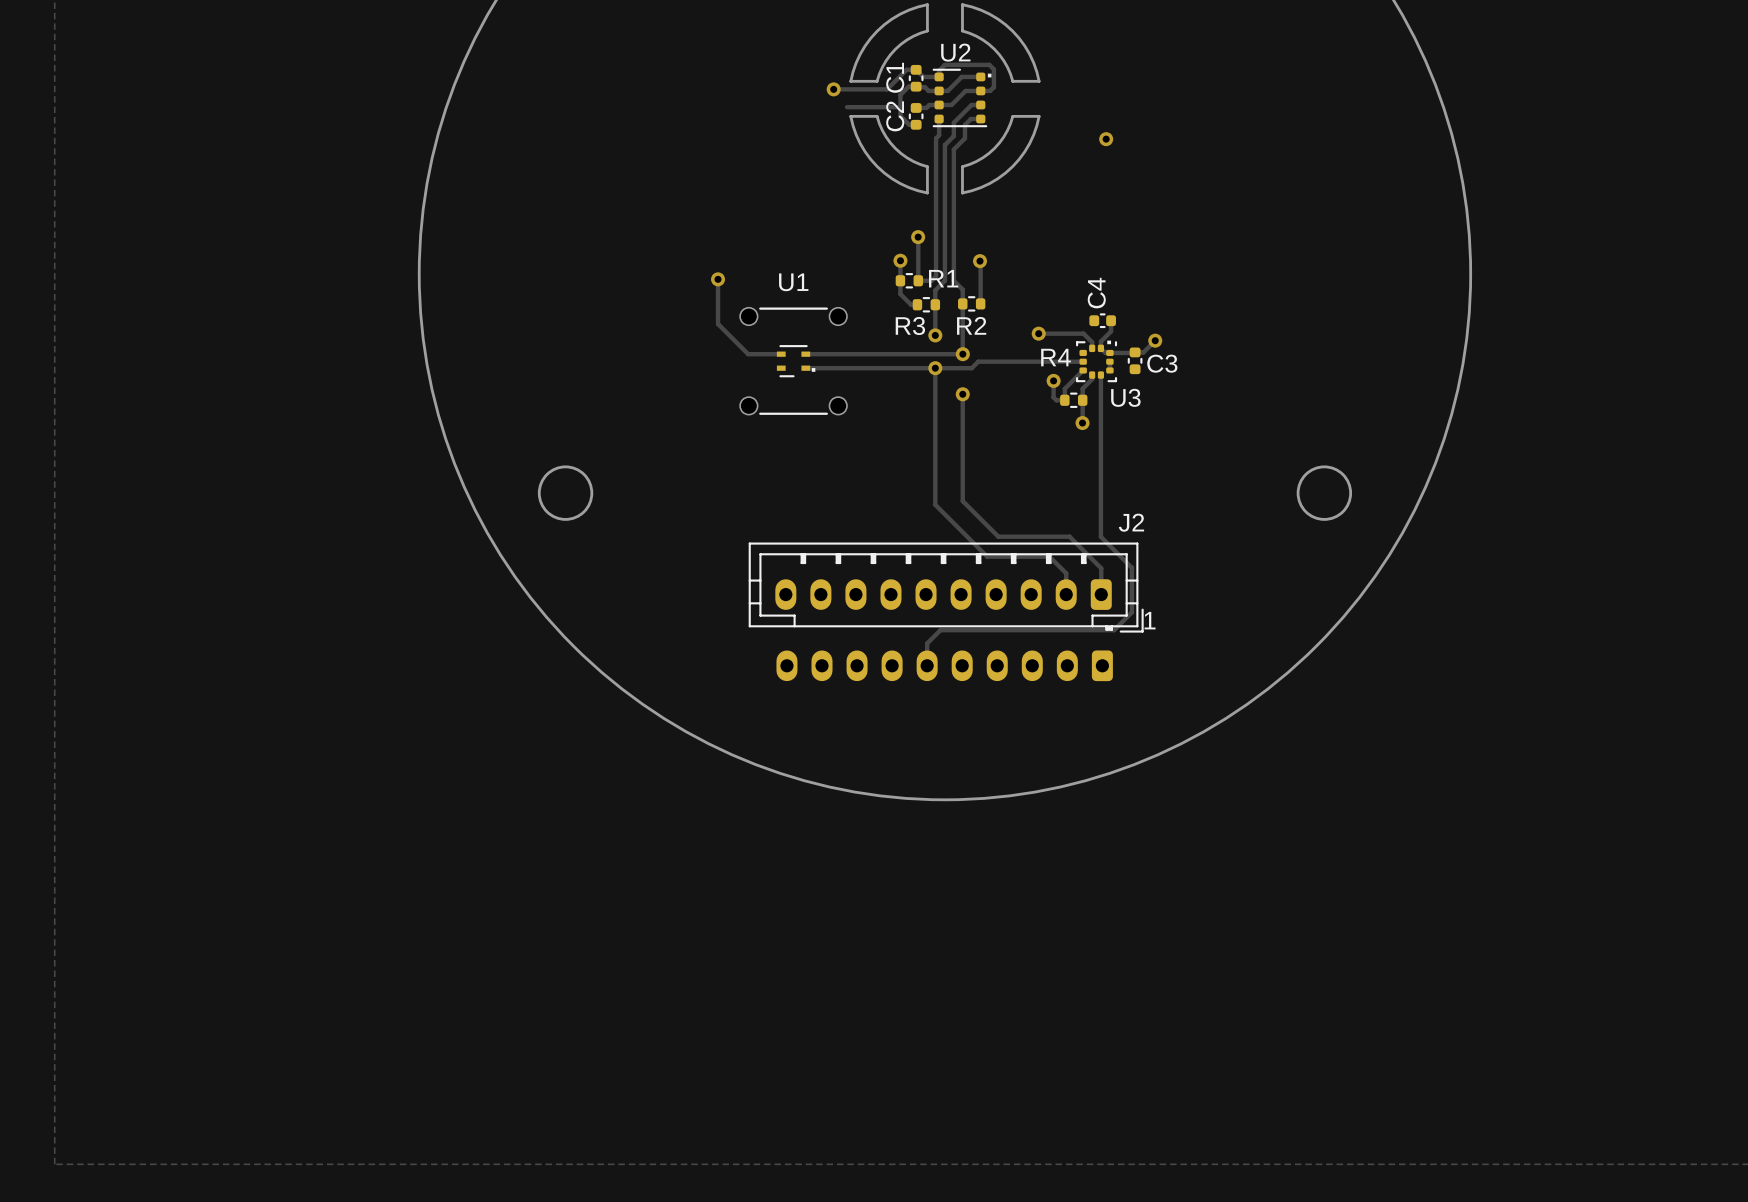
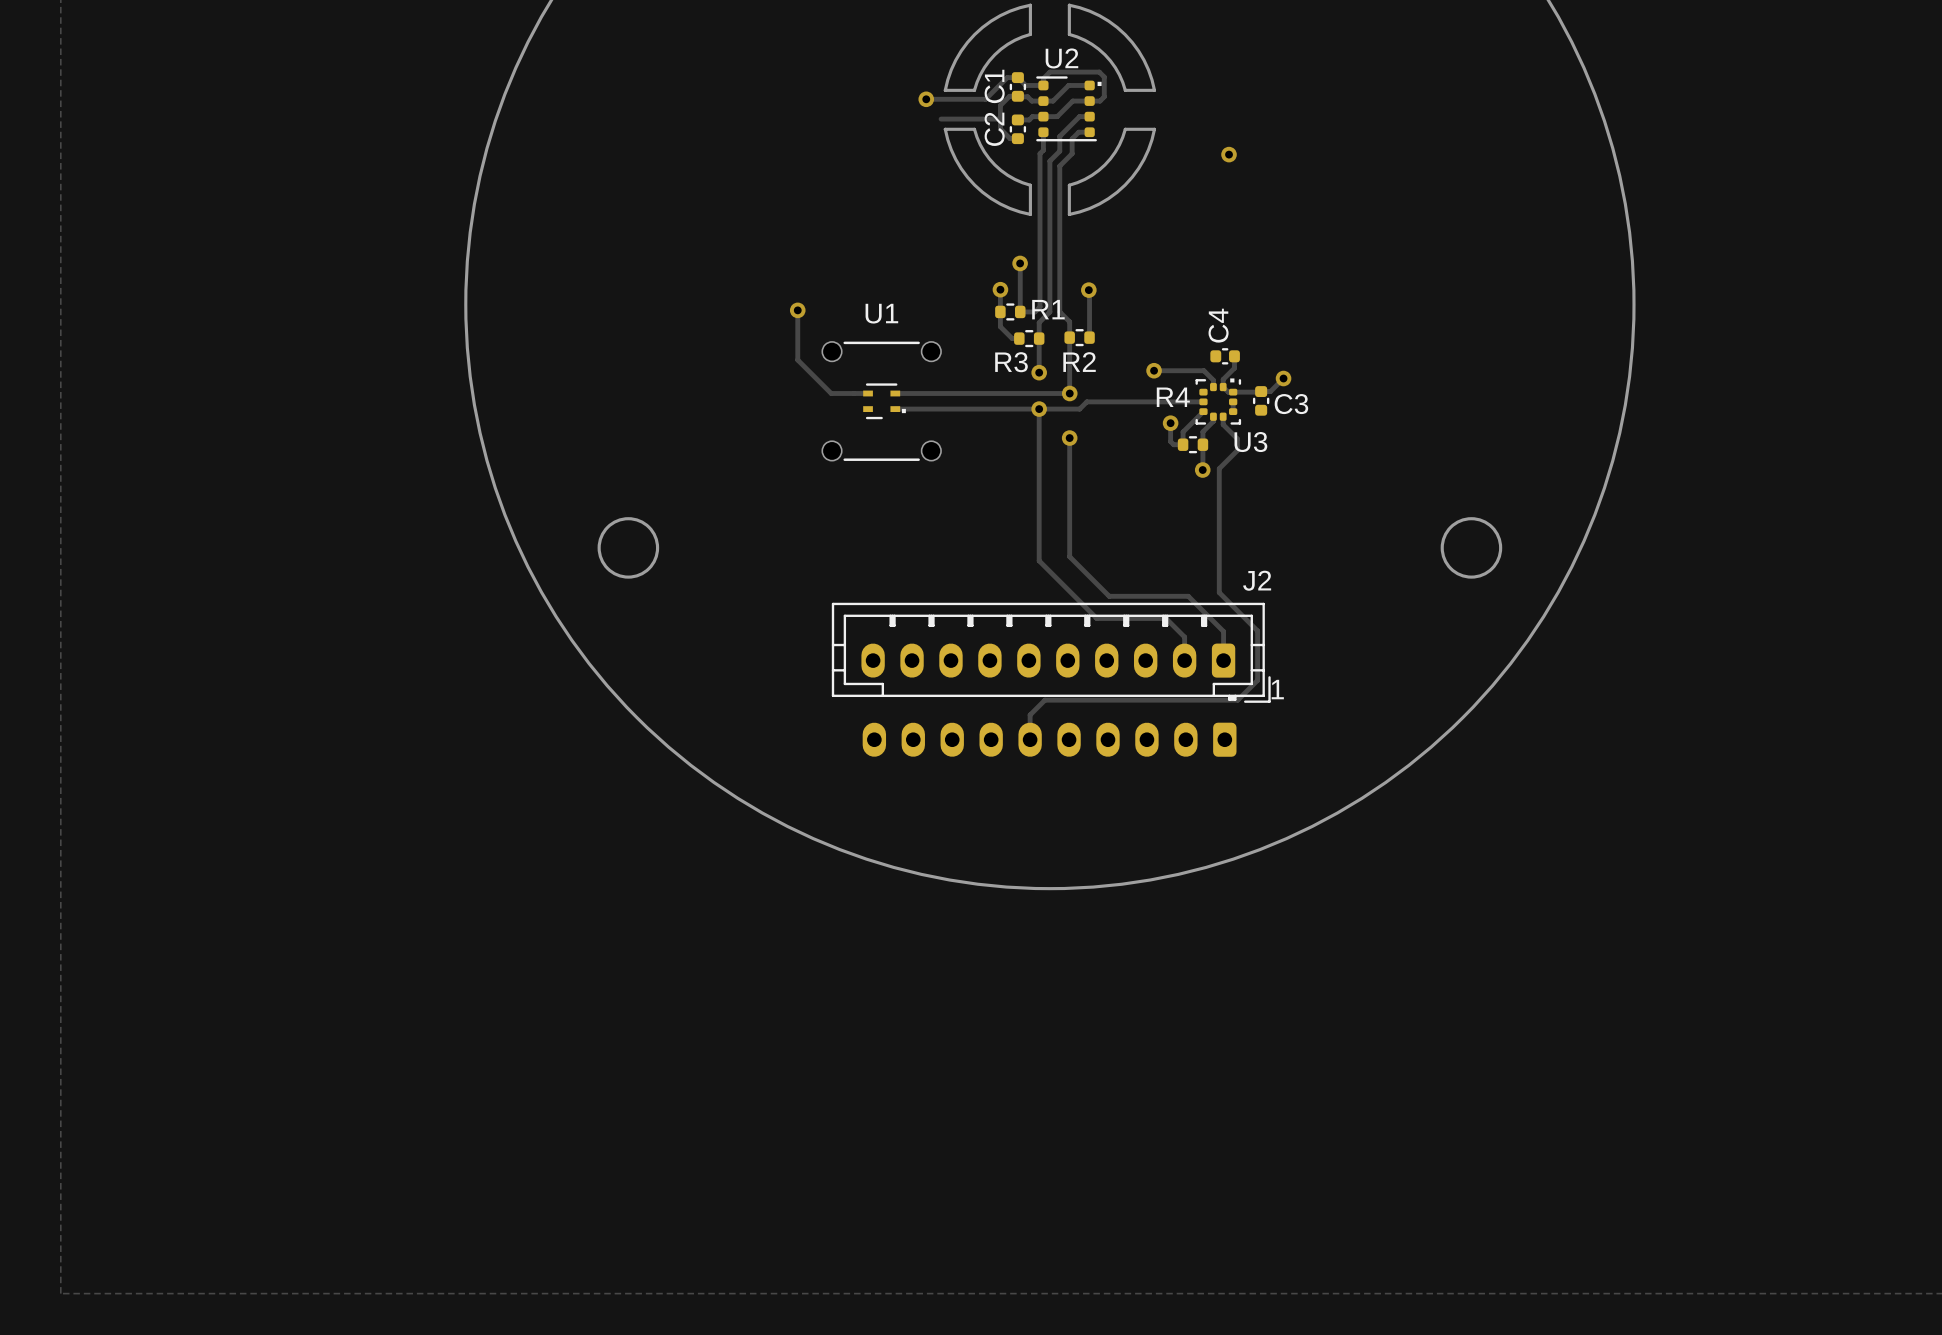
track: (1100, 382) (1100, 536) -> (1223, 424) (1237, 438) (1237, 450) (1219, 468) (1219, 592) (1223, 596)

